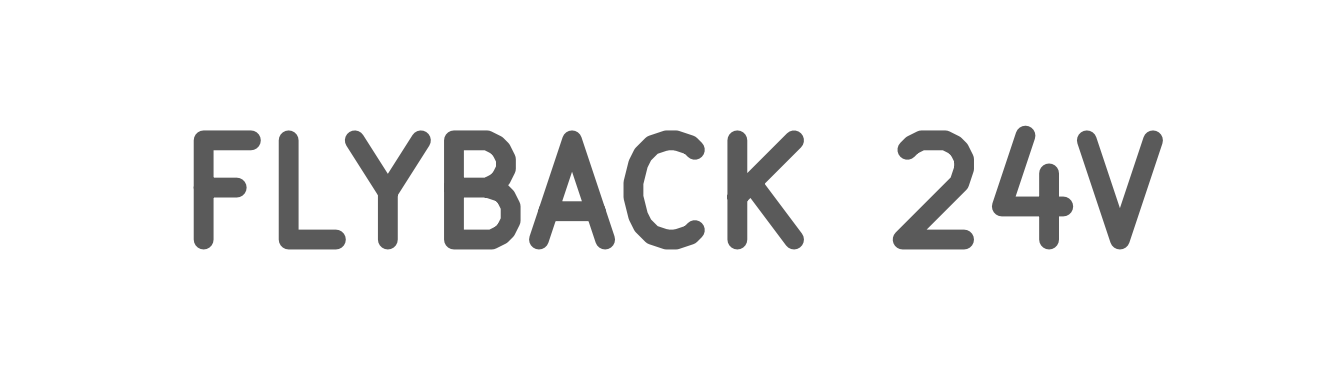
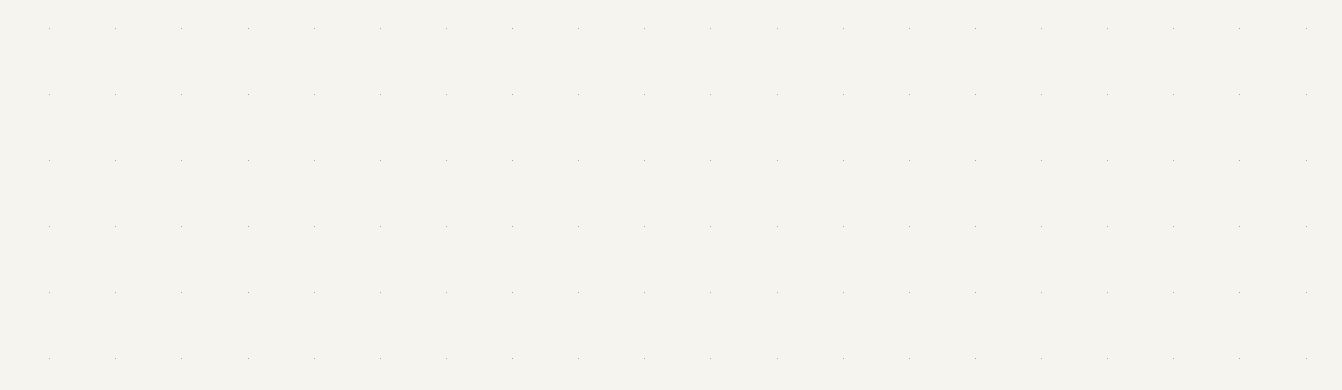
text: FLYBACK 24V (678, 187) -> none

